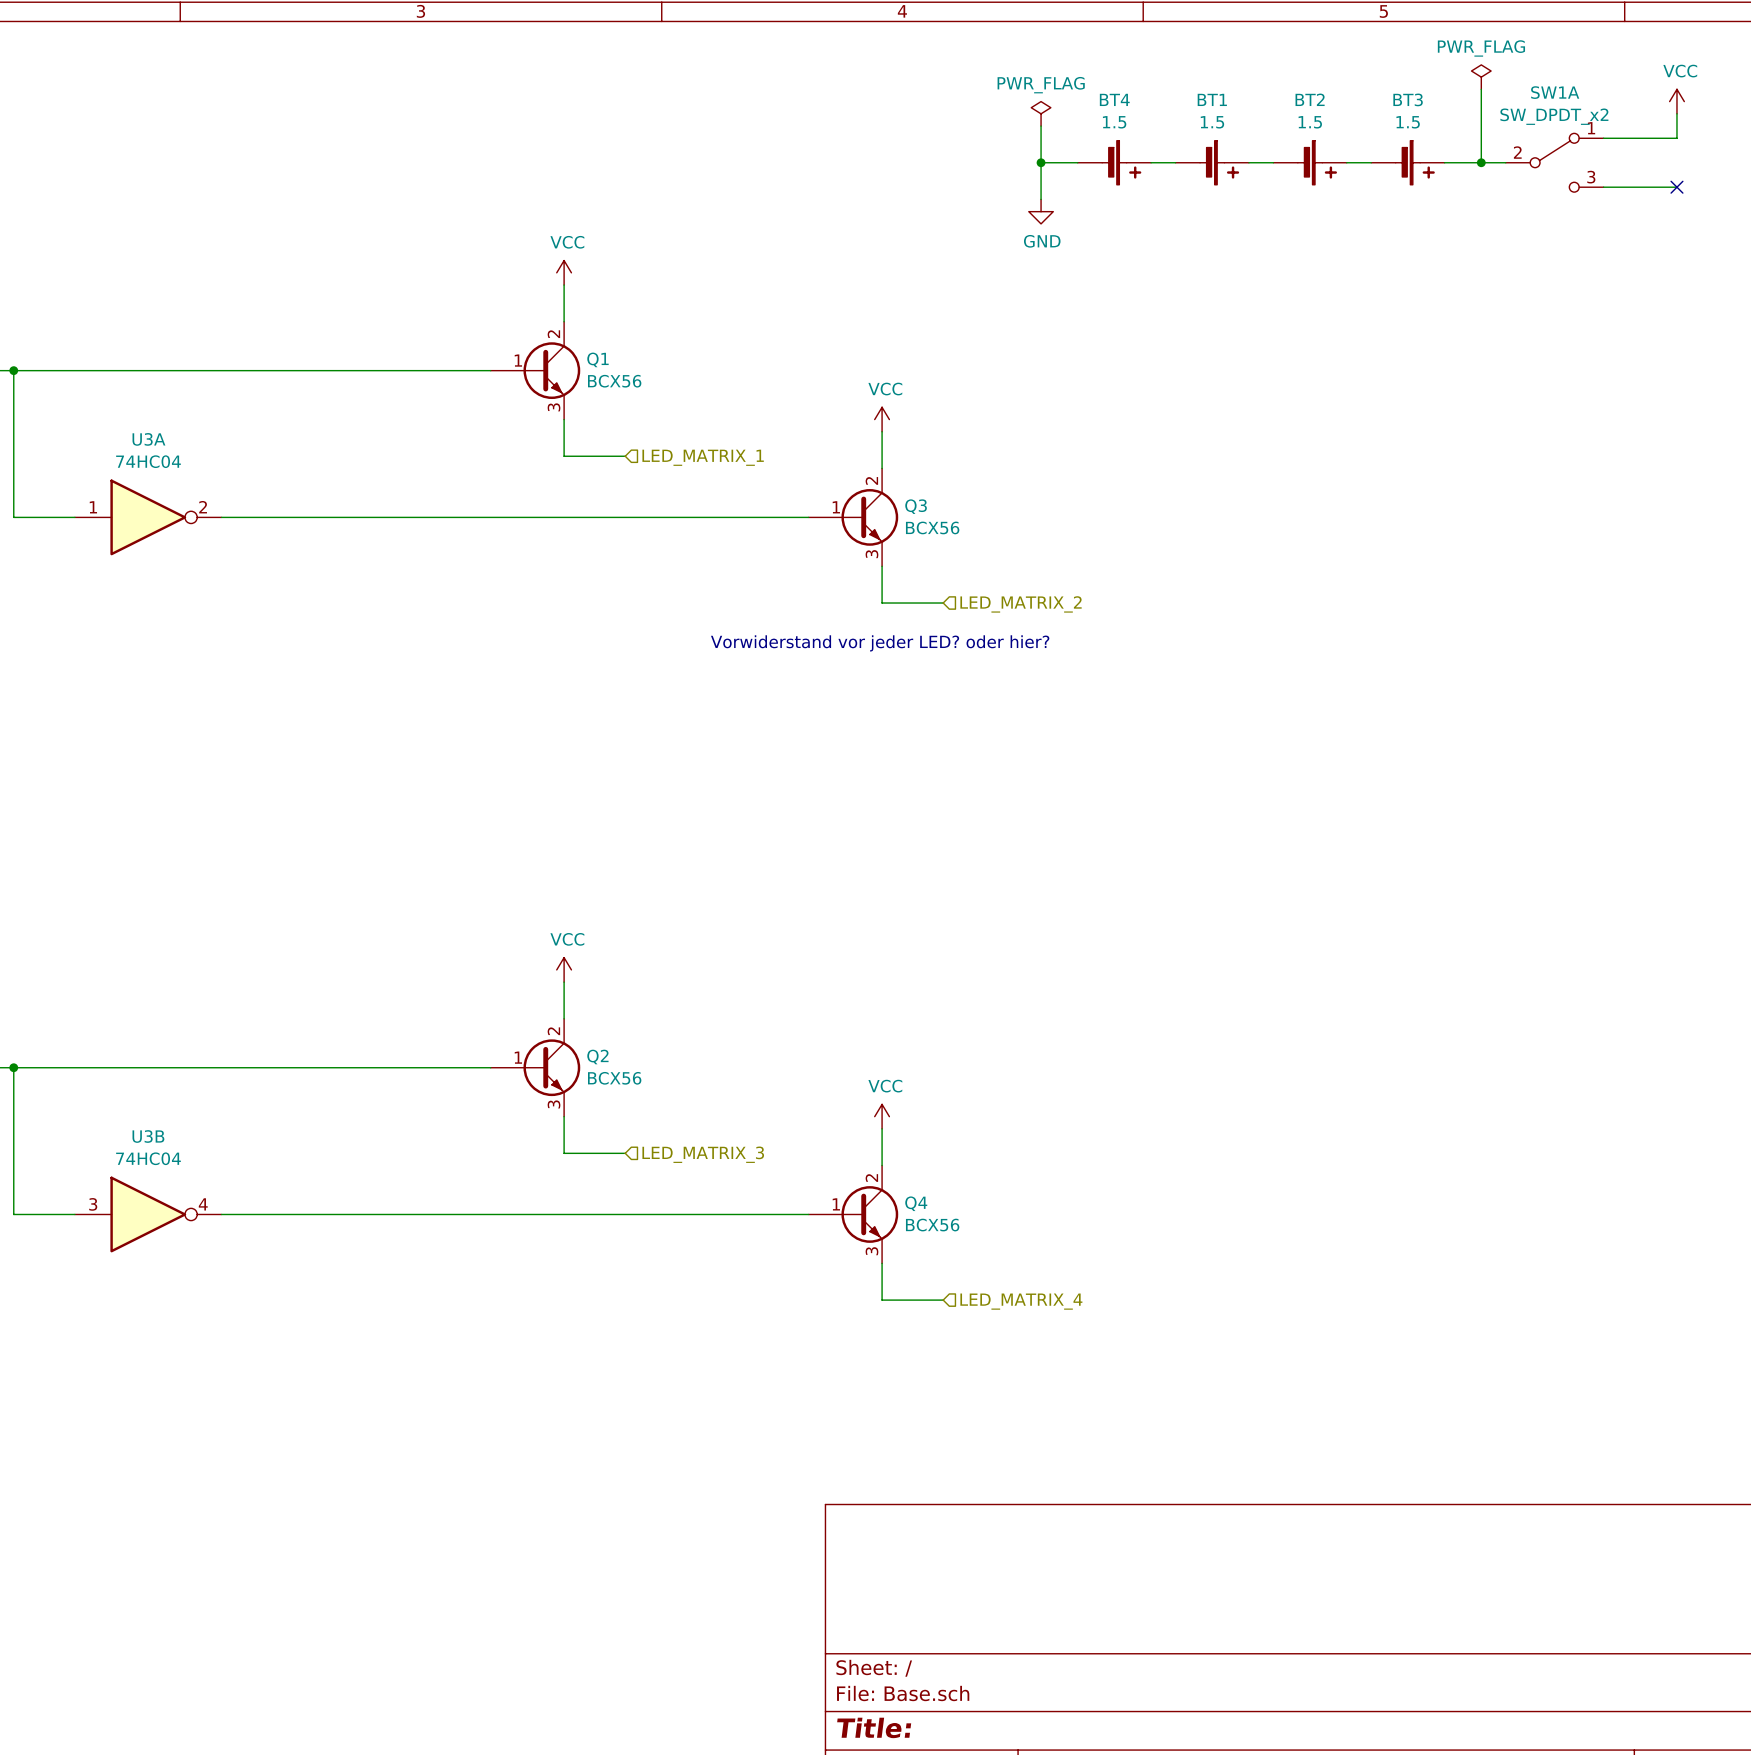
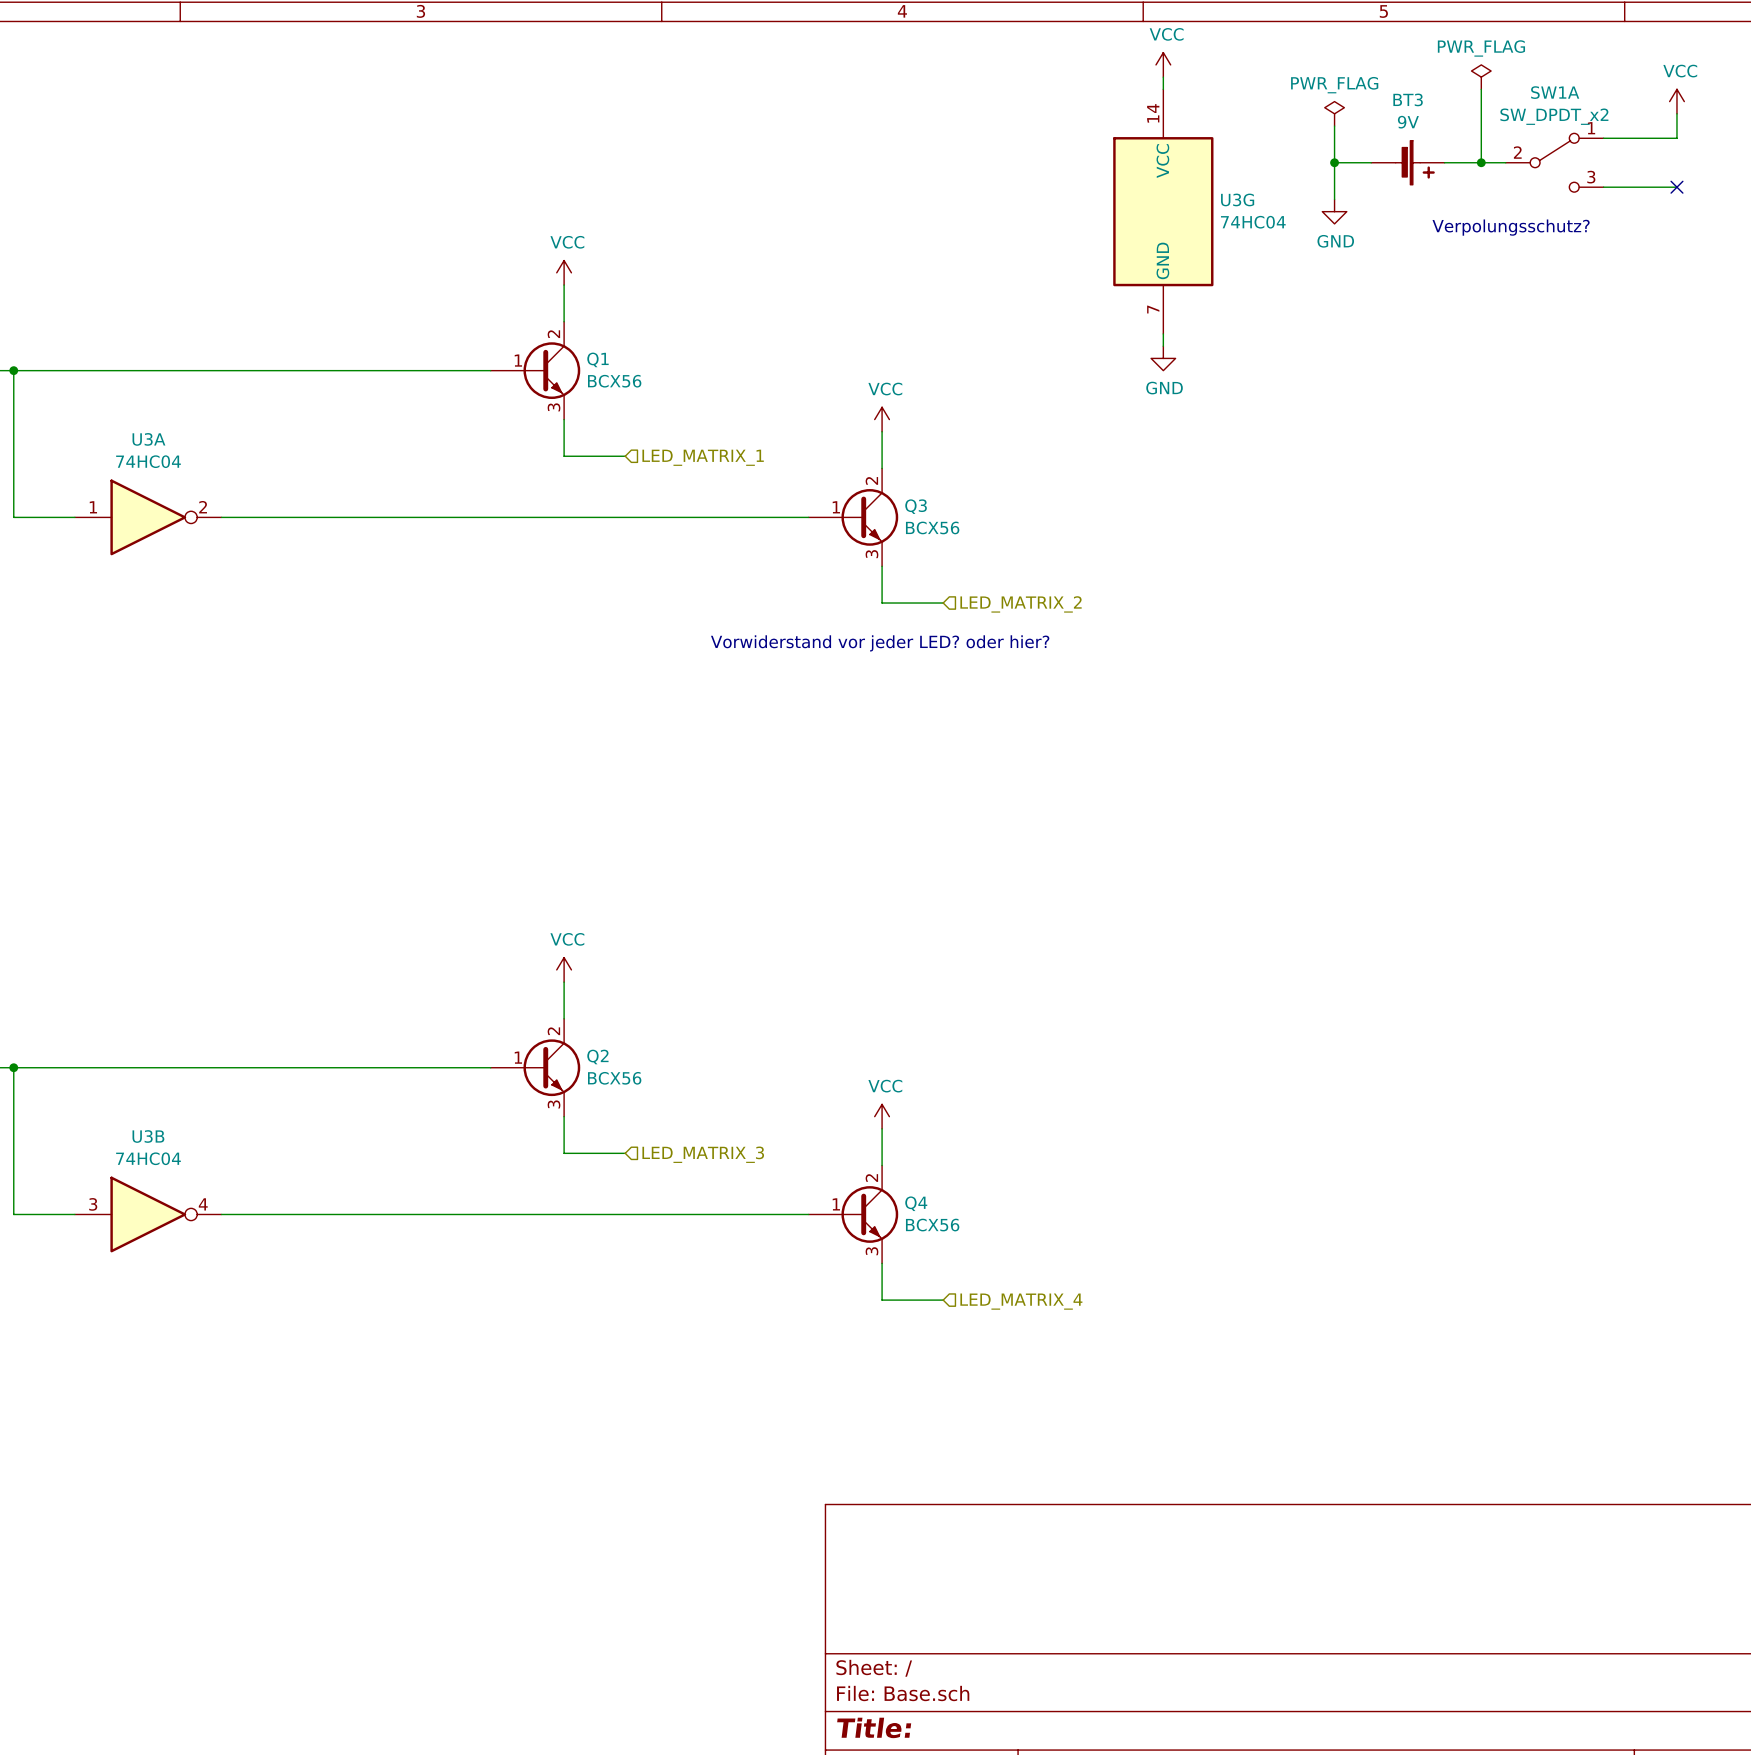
power symbol: none -> VCC (1163, 64)
wire: none -> (1163, 77) (1163, 89)
power symbol: PWR_FLAG (1041, 113) -> none
power symbol: none -> PWR_FLAG (1334, 113)
BT3 value: 1.5 (1408, 122) -> 9V (1408, 122)
wire: (1041, 126) (1041, 199) -> none
wire: none -> (1334, 126) (1334, 199)
wire: (1041, 162) (1077, 162) -> none
junction: (1041, 162) -> none
BT4: 1.5 (1114, 162) -> none
BT1: 1.5 (1212, 162) -> none
wire: (1248, 162) (1273, 162) -> none
BT2: 1.5 (1310, 162) -> none
junction: none -> (1334, 162)
power symbol: GND (1041, 211) -> none
U3G: none -> 74HC04 (1163, 211)
power symbol: none -> GND (1334, 211)
text: none -> Verpolungsschutz? (1511, 227)
wire: none -> (1163, 333) (1163, 346)
power symbol: none -> GND (1163, 358)

